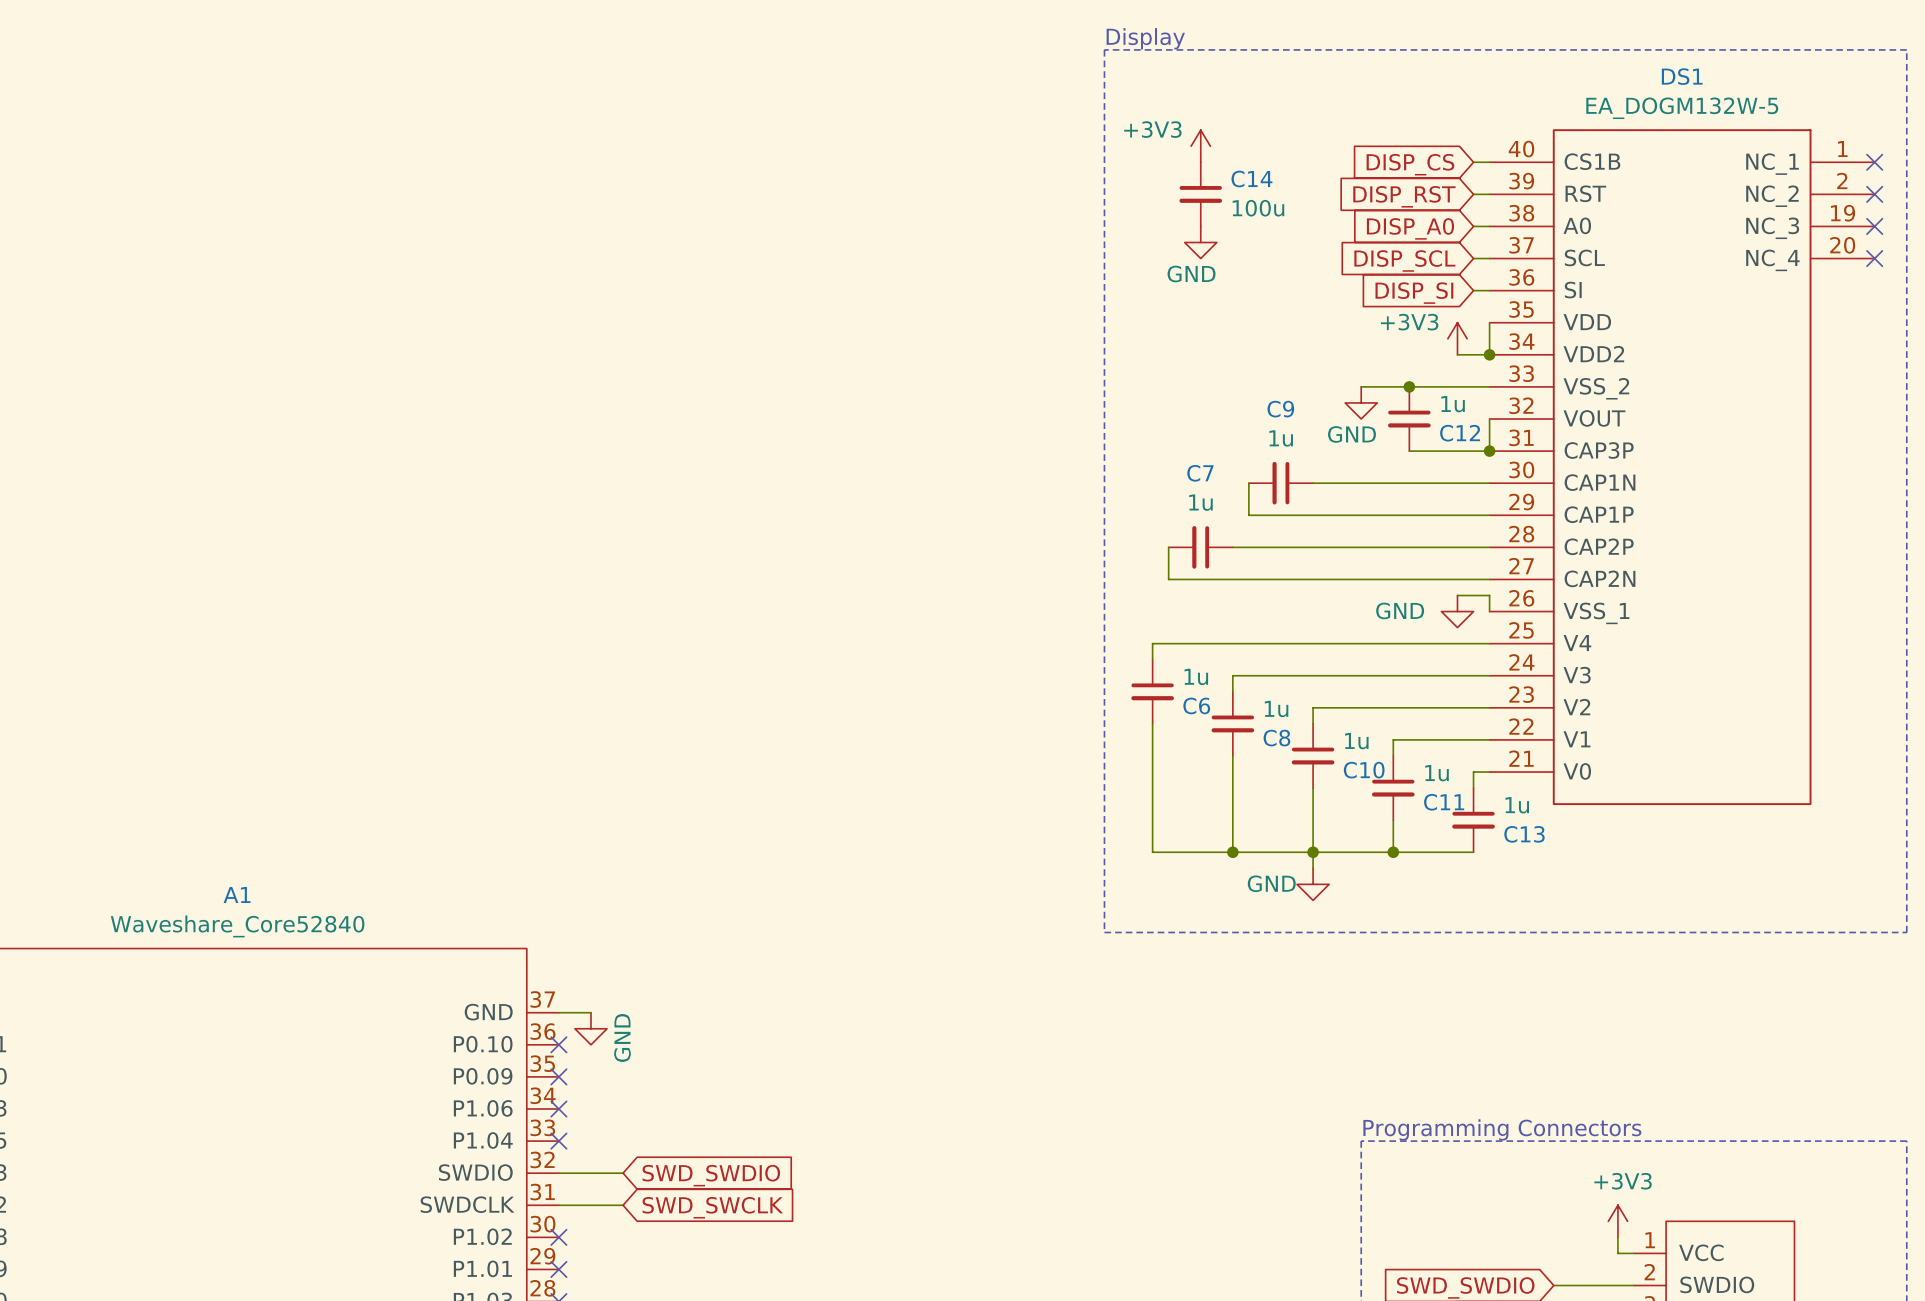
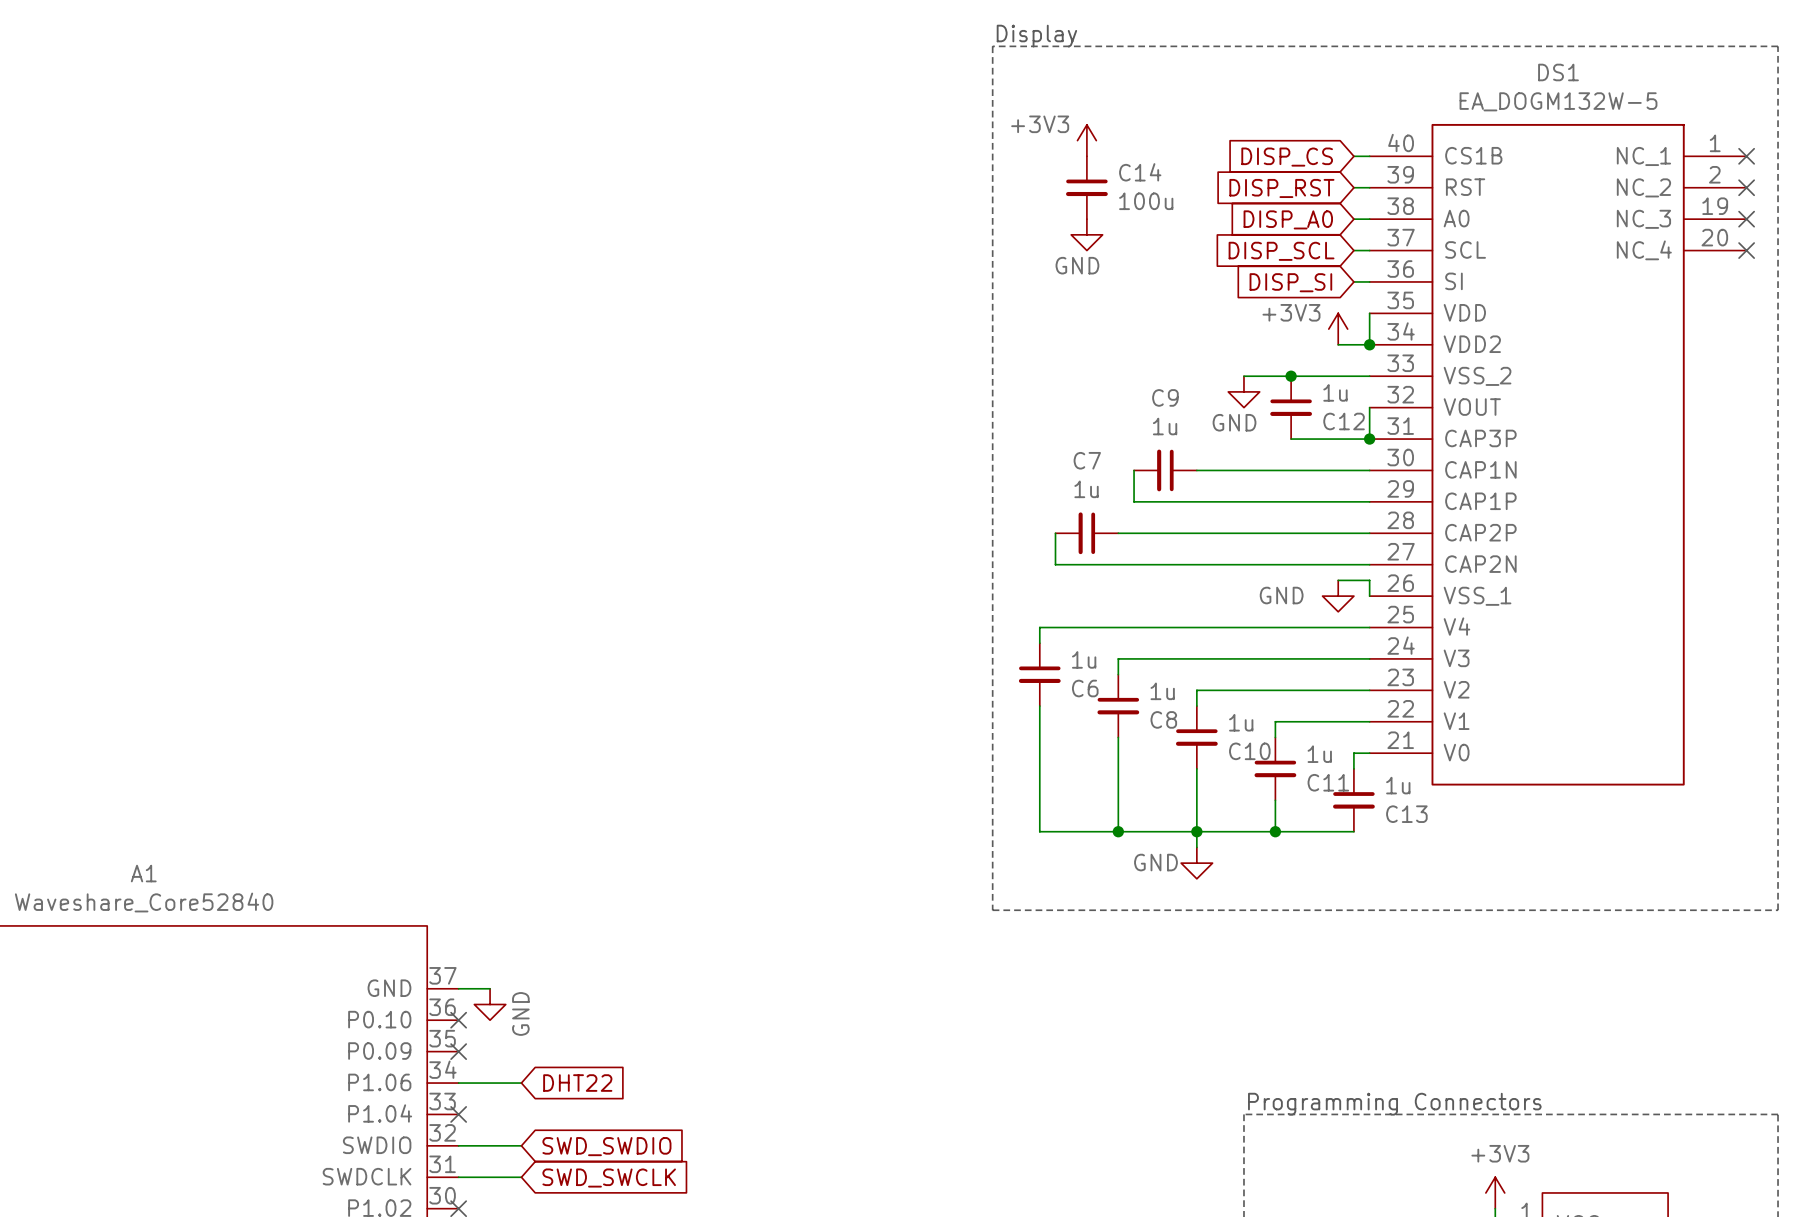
global label: none -> DHT22 (577, 1083)
wire: none -> (458, 1083) (521, 1083)
no-connect mark: (558, 1109) -> none

